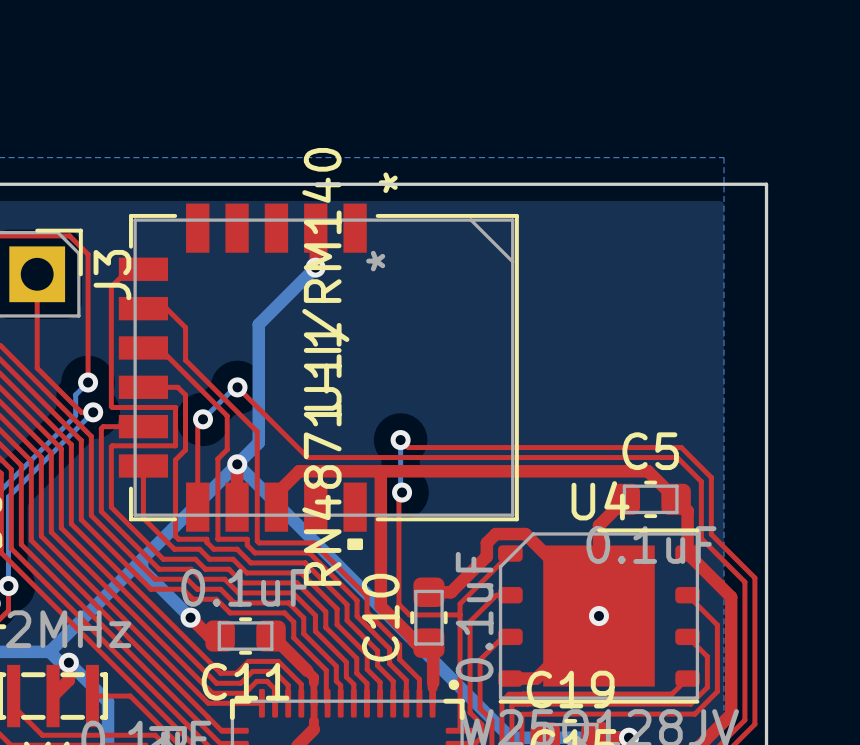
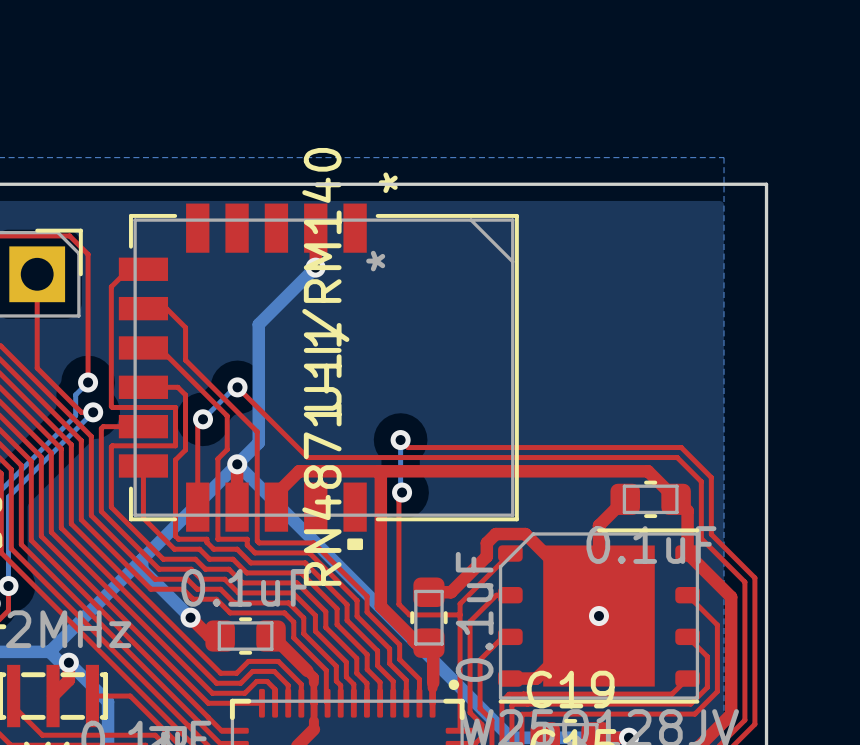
J3 name: J3 (112, 275) -> none
C5 name: C5 (650, 451) -> none
U4 name: U4 (600, 500) -> none
C10 name: C10 (380, 617) -> none
C11 name: C11 (245, 681) -> none

